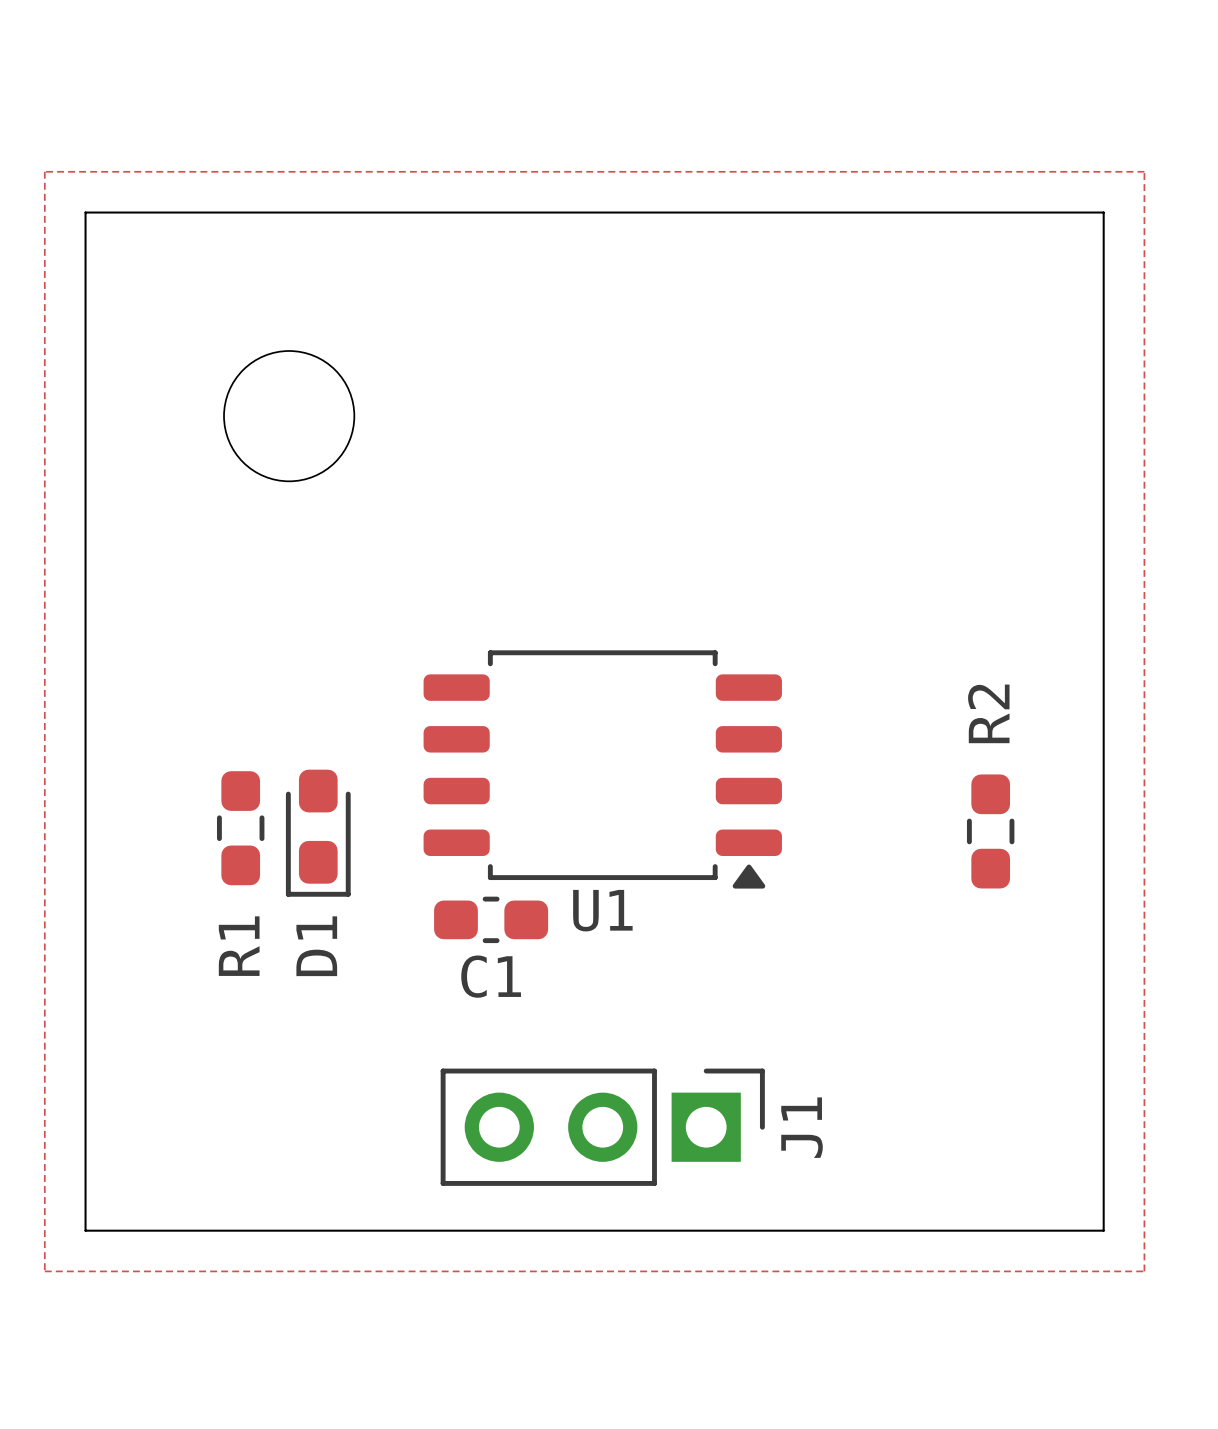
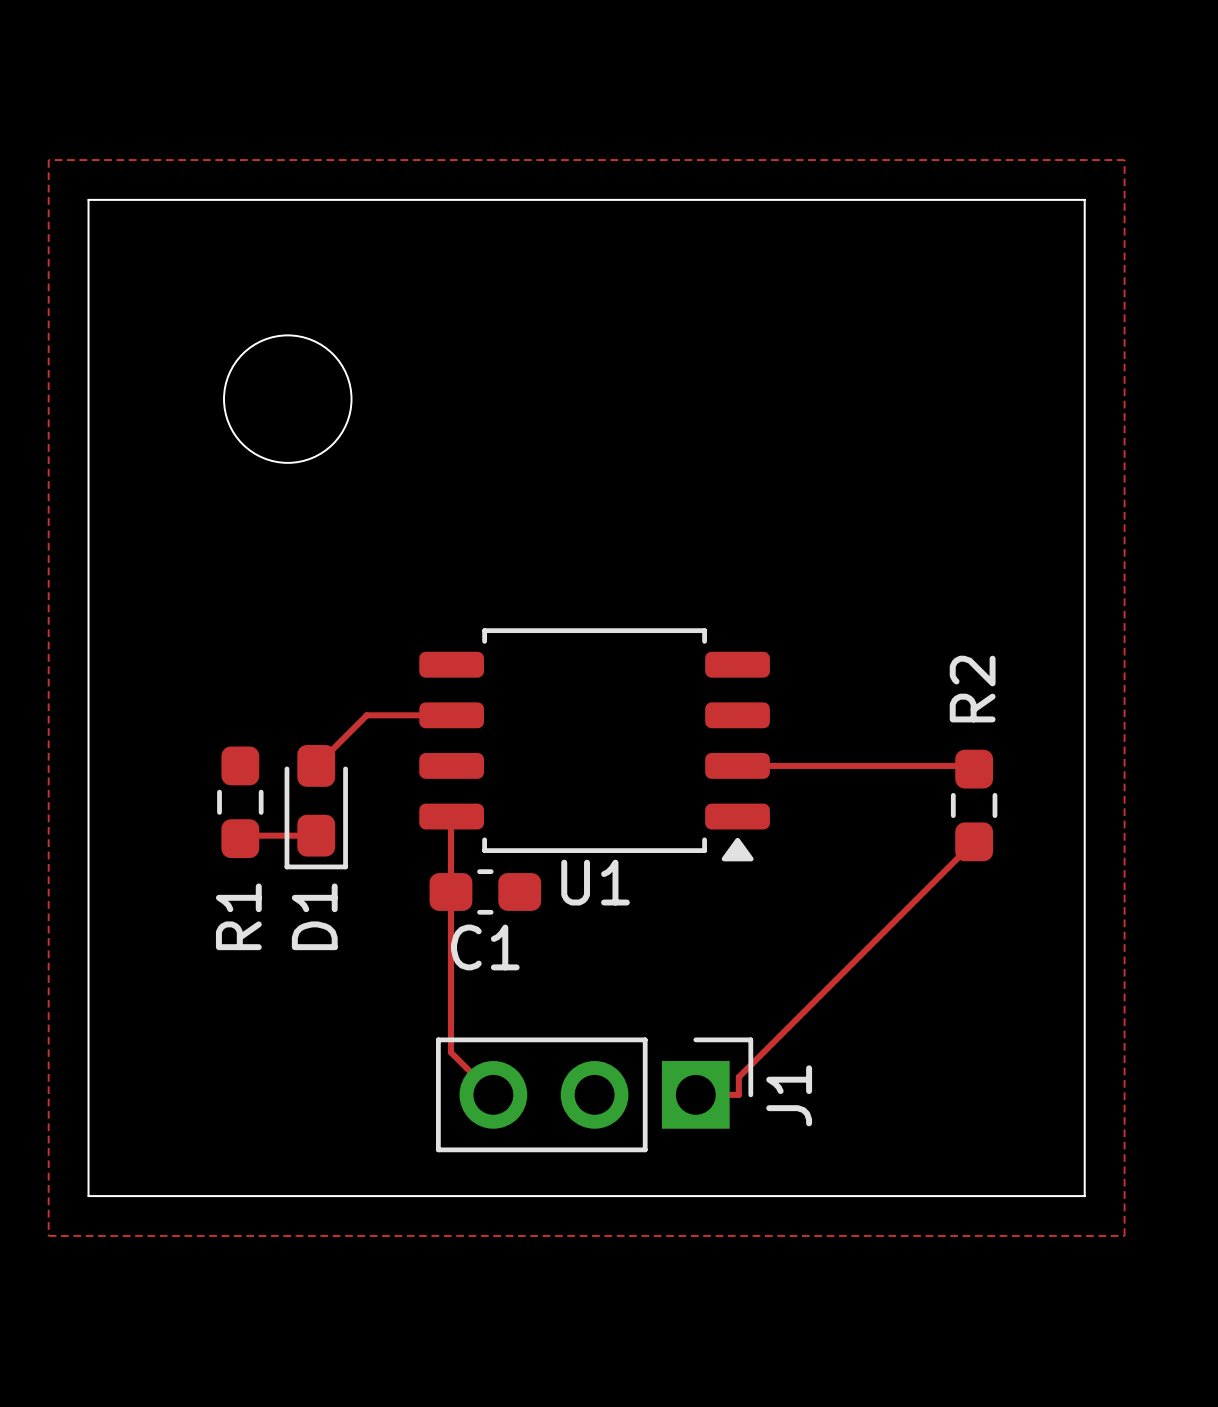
track: none -> (451, 715) (366, 715) (316, 765)
track: none -> (737, 765) (970, 765) (974, 769)
track: none -> (451, 816) (450, 1052) (493, 1094)
track: none -> (316, 835) (243, 835) (240, 838)
track: none -> (974, 841) (738, 1077) (738, 1094) (695, 1094)

